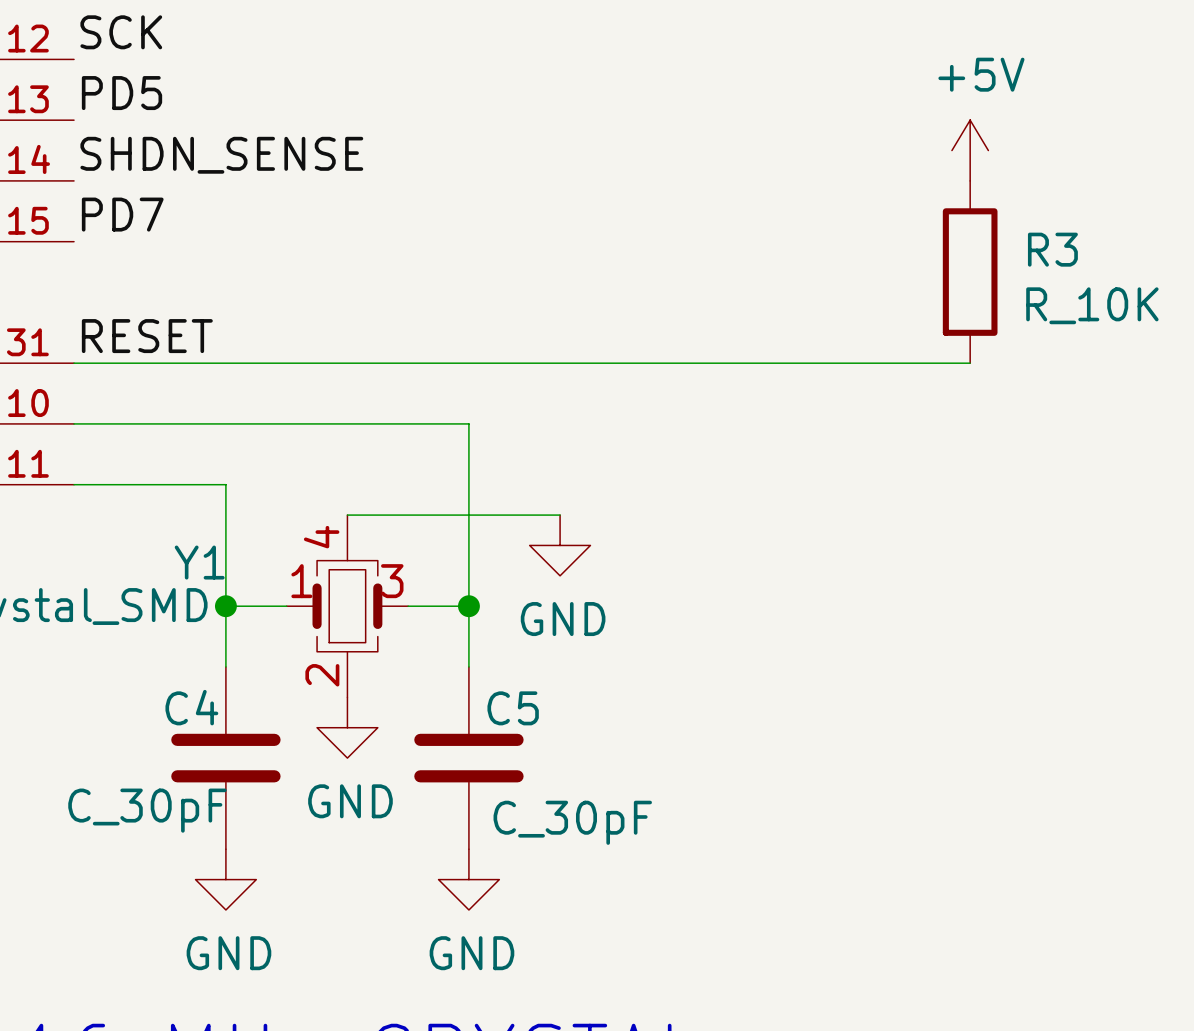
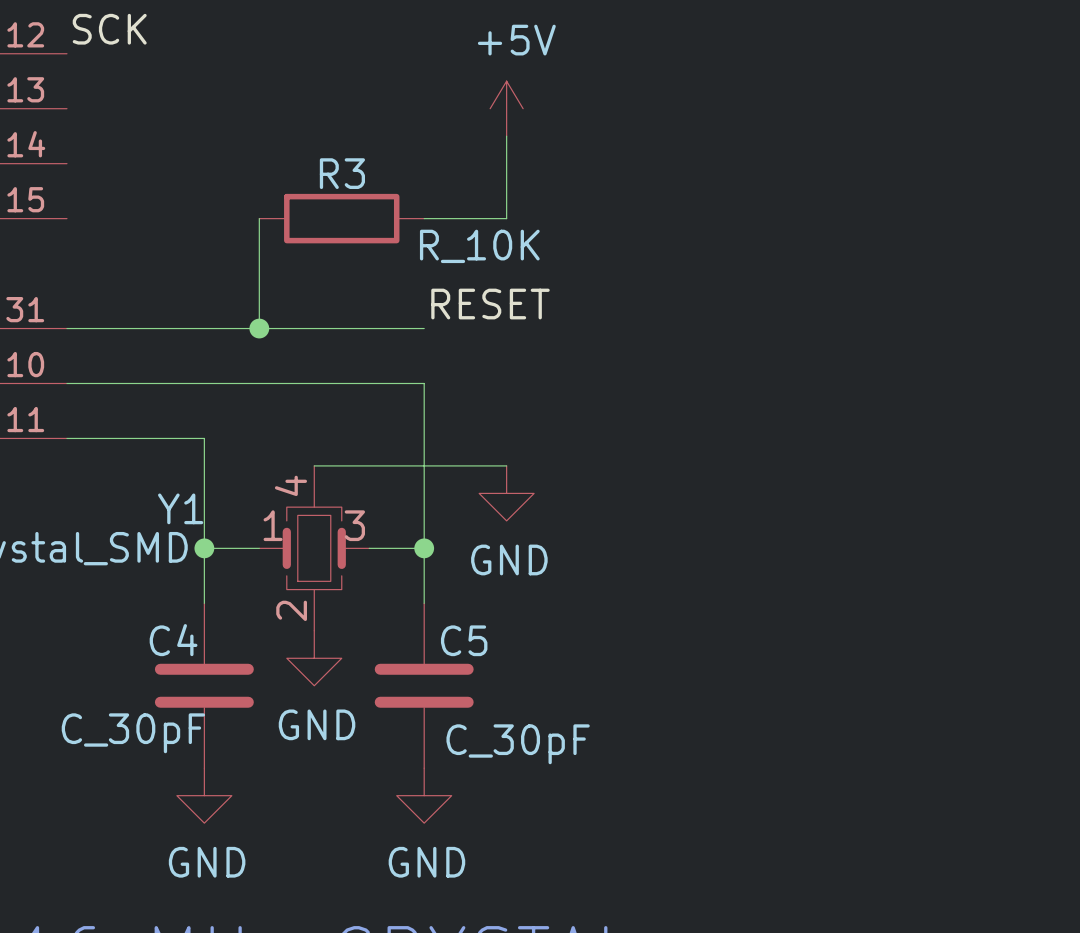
label: PD5 (122, 93) -> none
wire: none -> (506, 136) (506, 218) (424, 218)
power symbol position: +5V (970, 150) -> +5V (506, 108)
label: SHDN_SENSE (221, 155) -> none
label: PD7 (122, 214) -> none
wire: none -> (259, 218) (259, 328)
R3 name position: R3 (1052, 249) -> R3 (342, 173)
R3 rotation: 0° (970, 272) -> 90° clockwise (341, 218)
R3 position: (970, 272) -> (341, 218)
label position: RESET (147, 336) -> RESET (490, 304)
junction: none -> (259, 328)
wire: (468, 363) (970, 363) -> none

